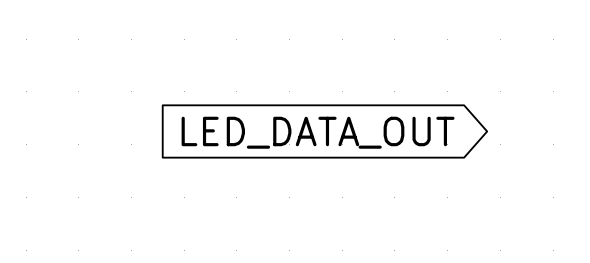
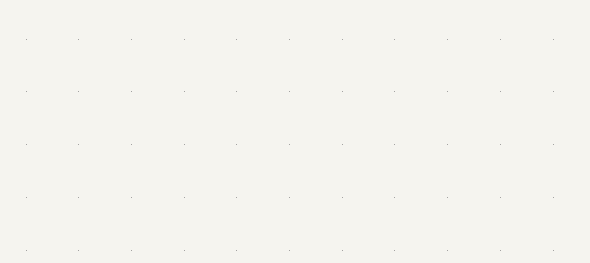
global label: LED_DATA_OUT (318, 132) -> none

